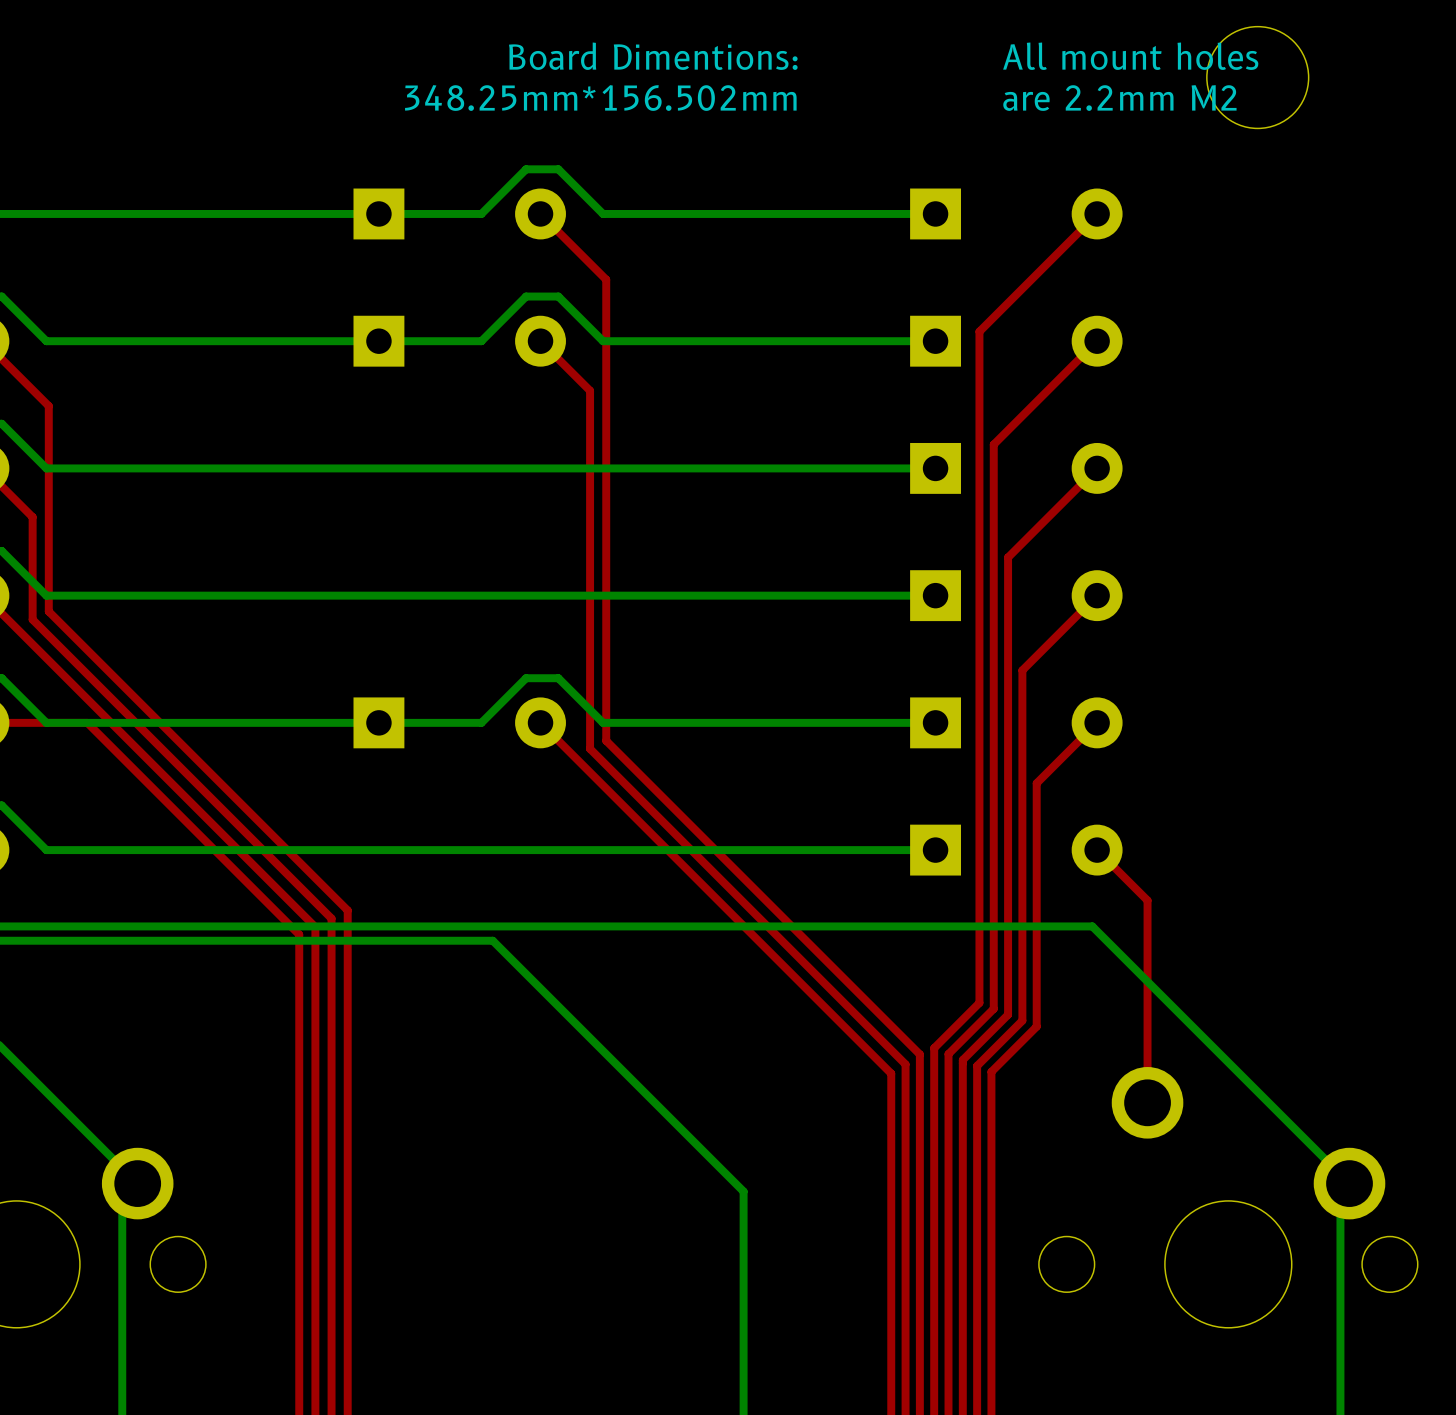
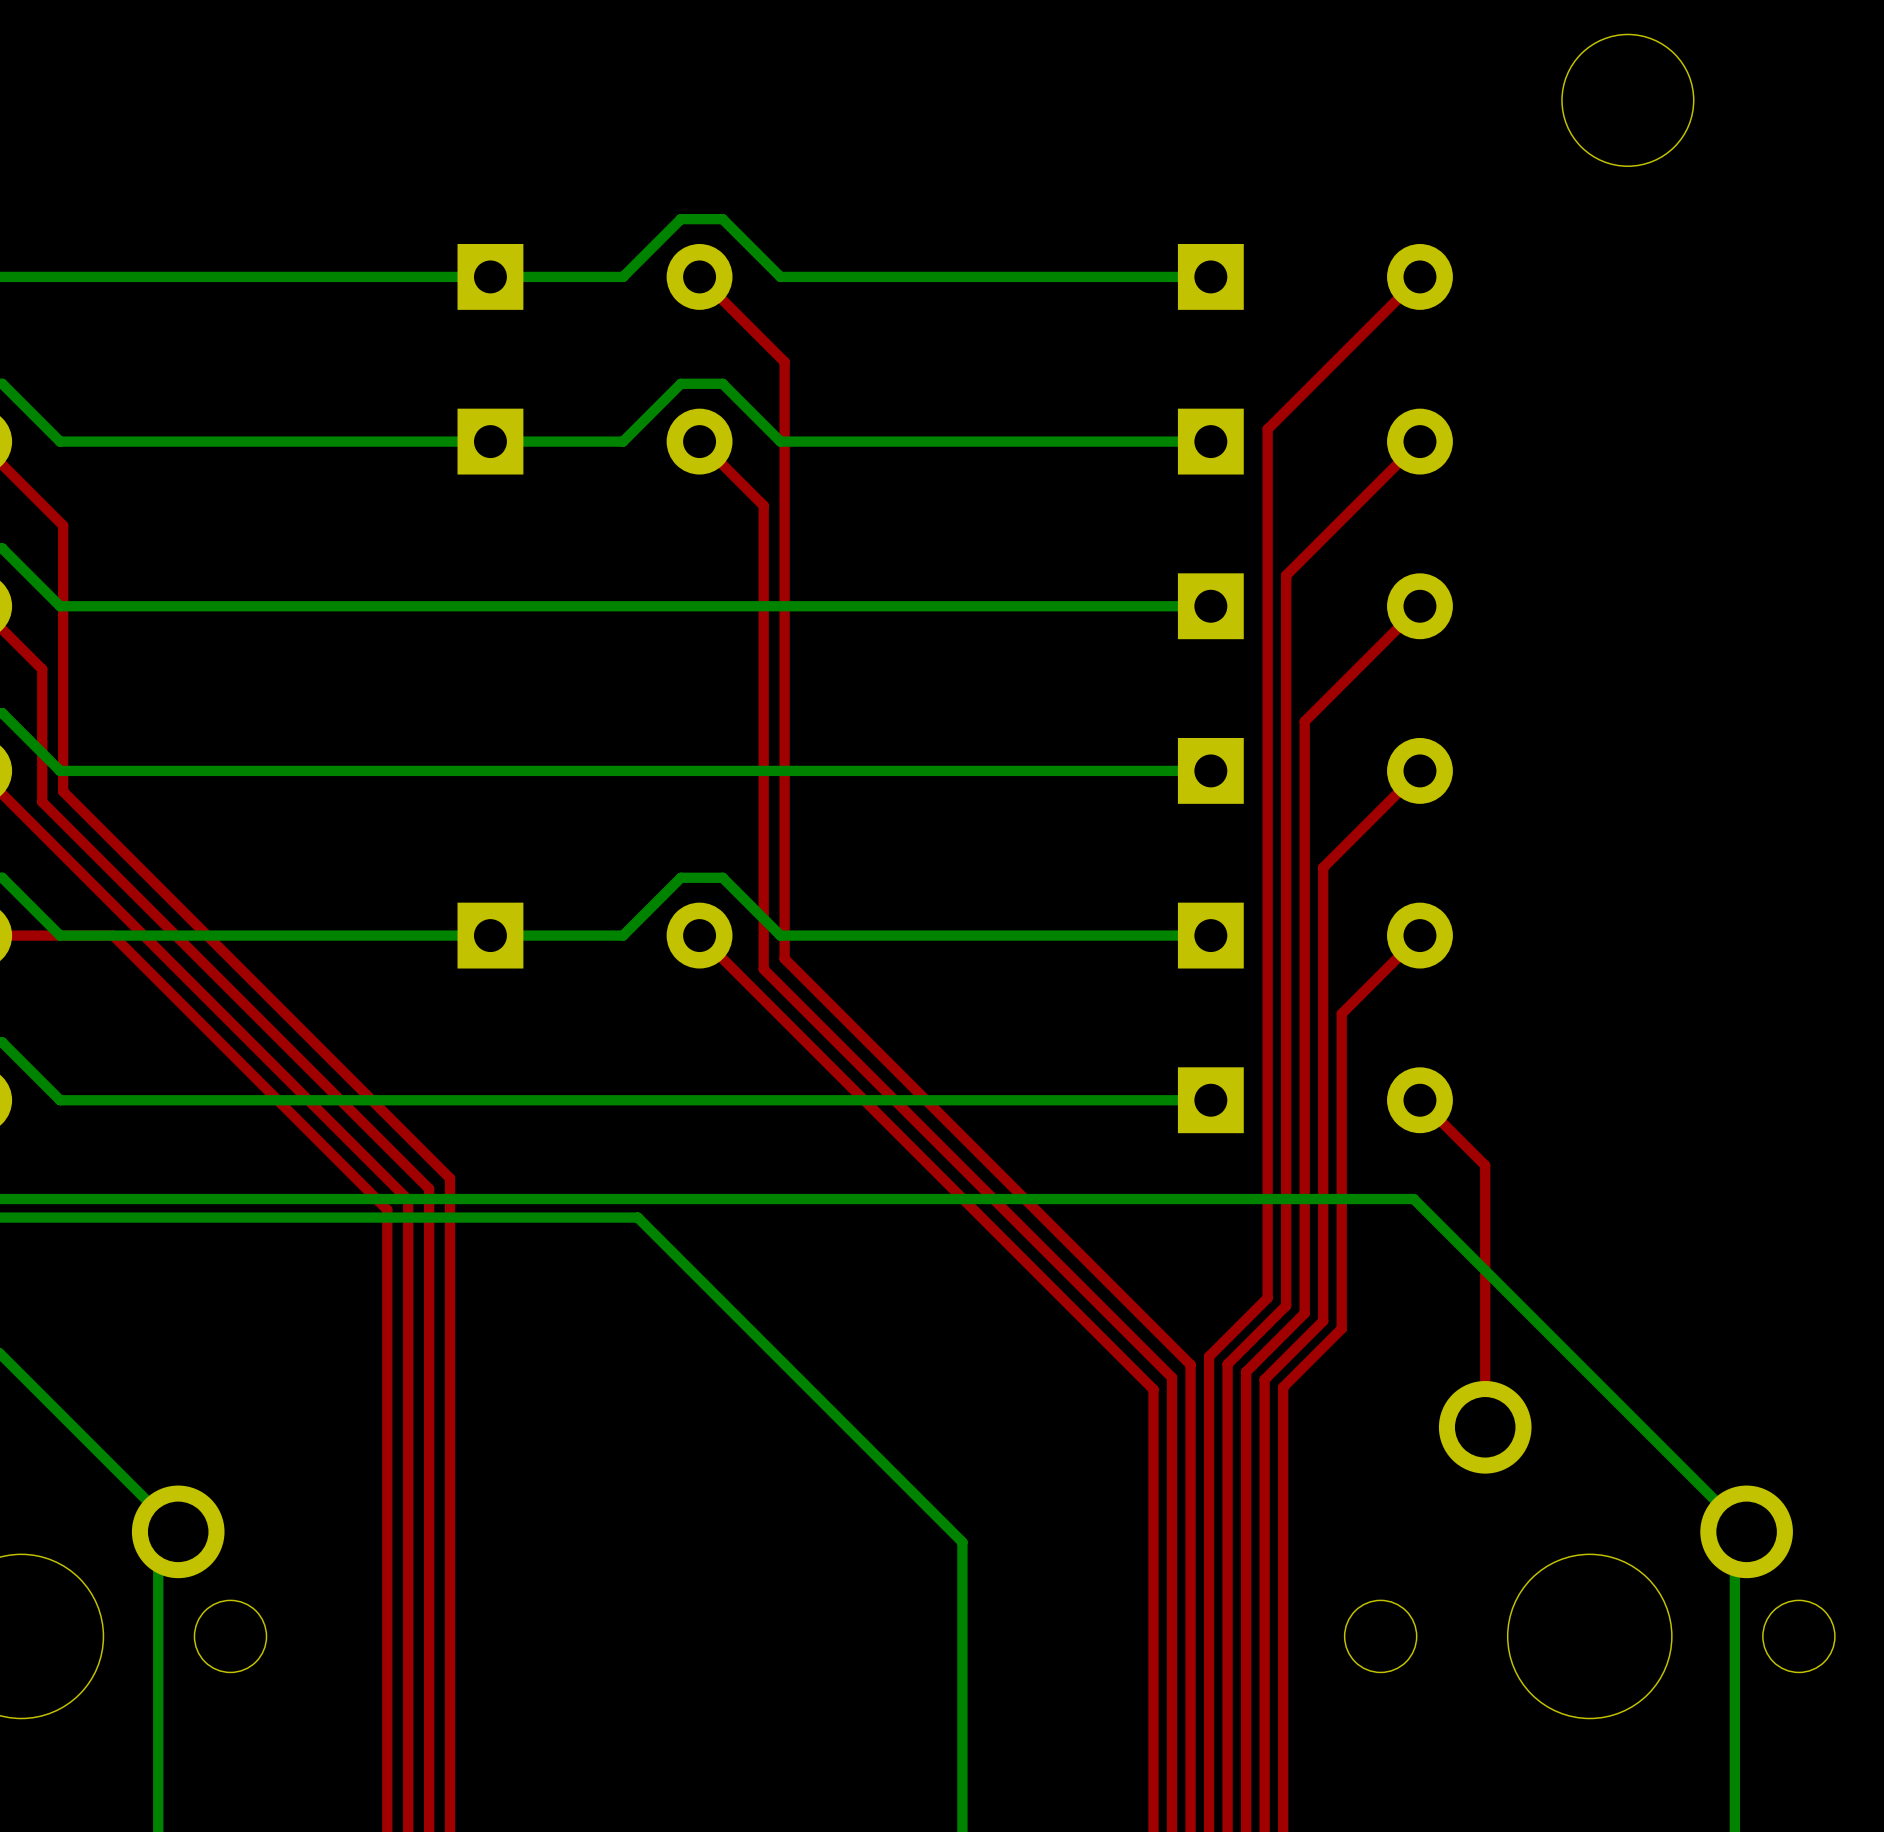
text: Board Dimentions: (653, 56) -> none
text: All mount holes (1130, 56) -> none
text: 348.25mm*156.502mm (600, 98) -> none
text: are 2.2mm M2 (1119, 98) -> none

